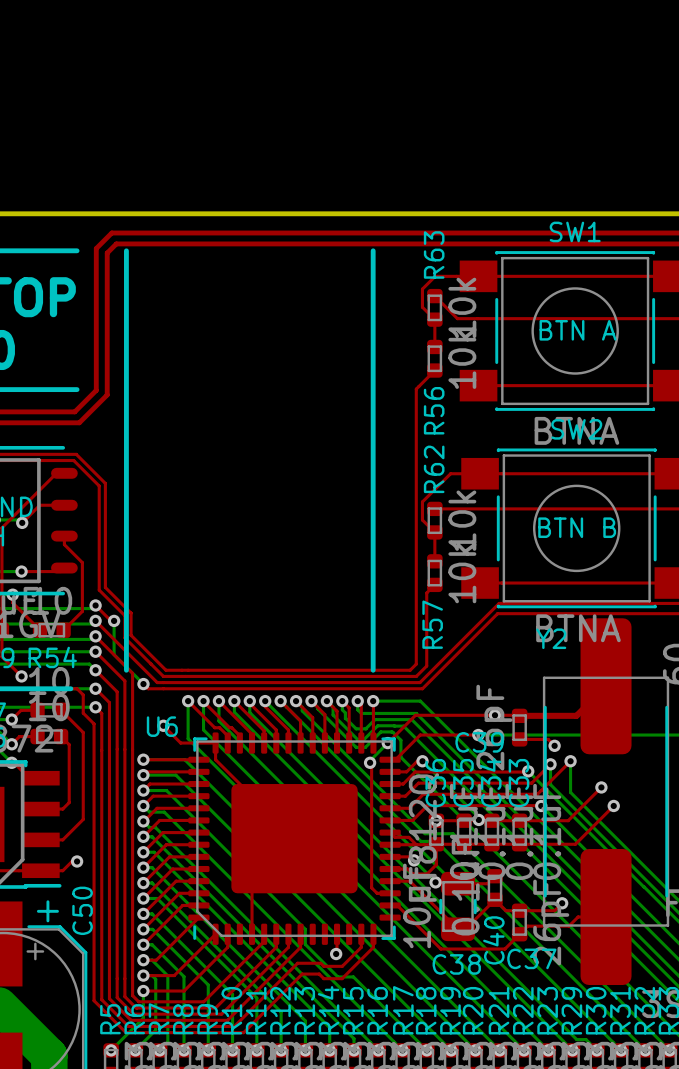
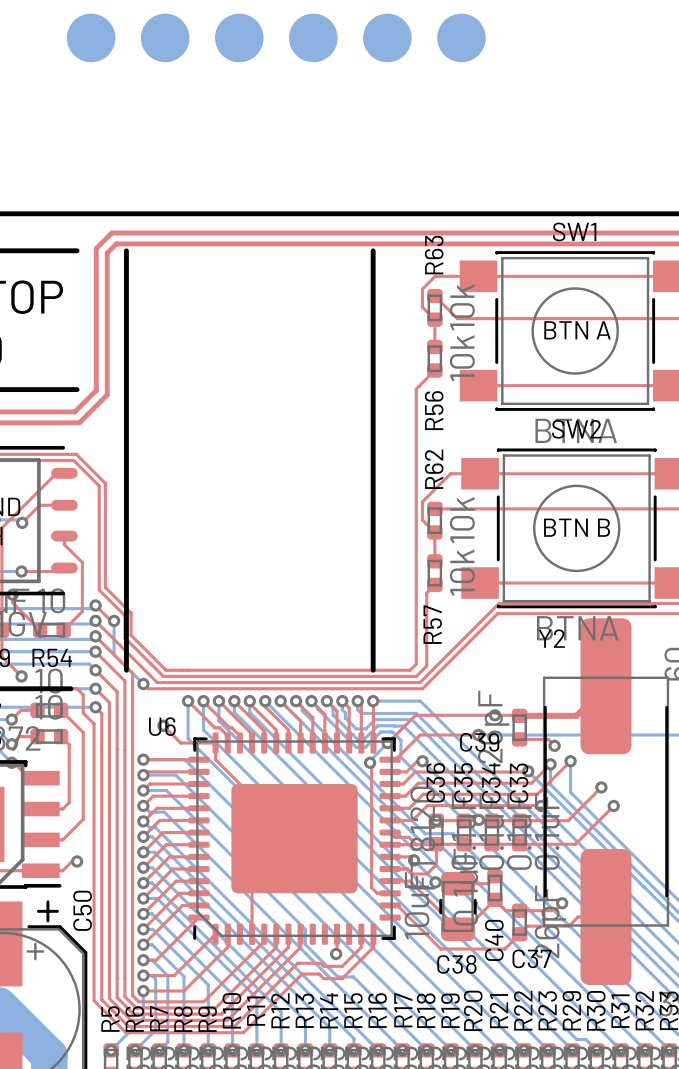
part: none -> (91, 37)
part: none -> (165, 37)
part: none -> (239, 37)
part: none -> (313, 37)
part: none -> (387, 37)
part: none -> (461, 37)

